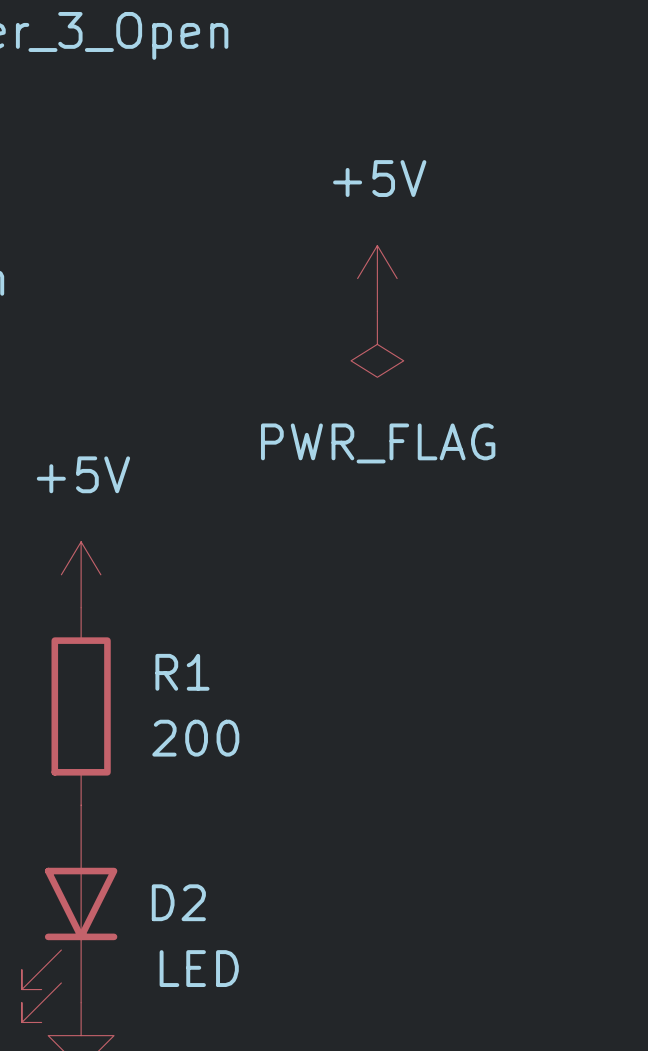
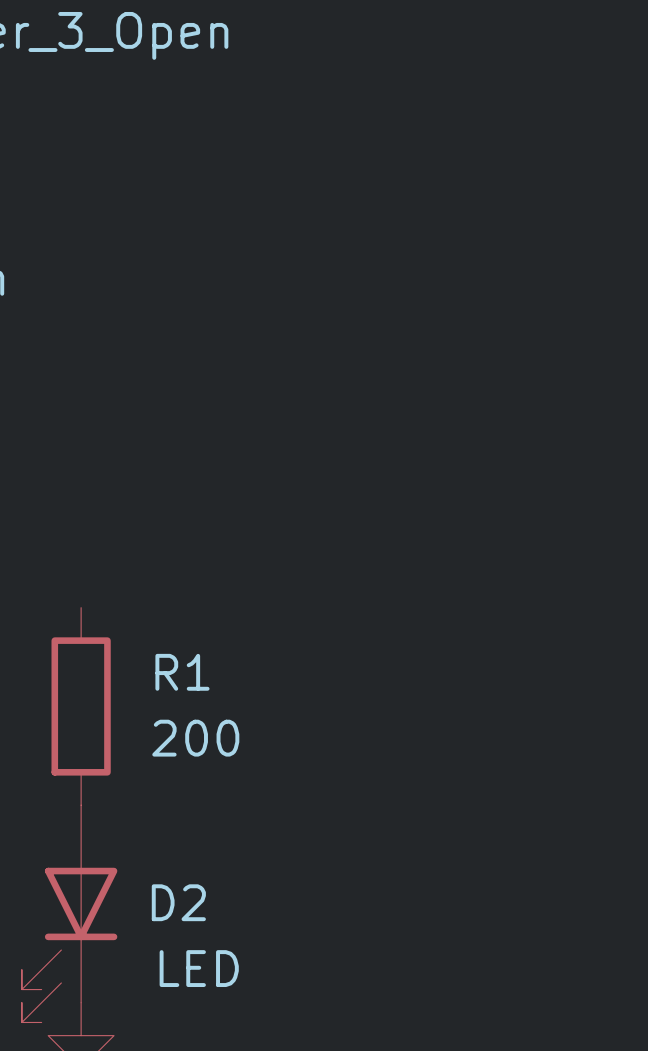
power symbol: +5V (377, 278) -> none
power symbol: PWR_FLAG (377, 344) -> none
power symbol: +5V (81, 574) -> none

